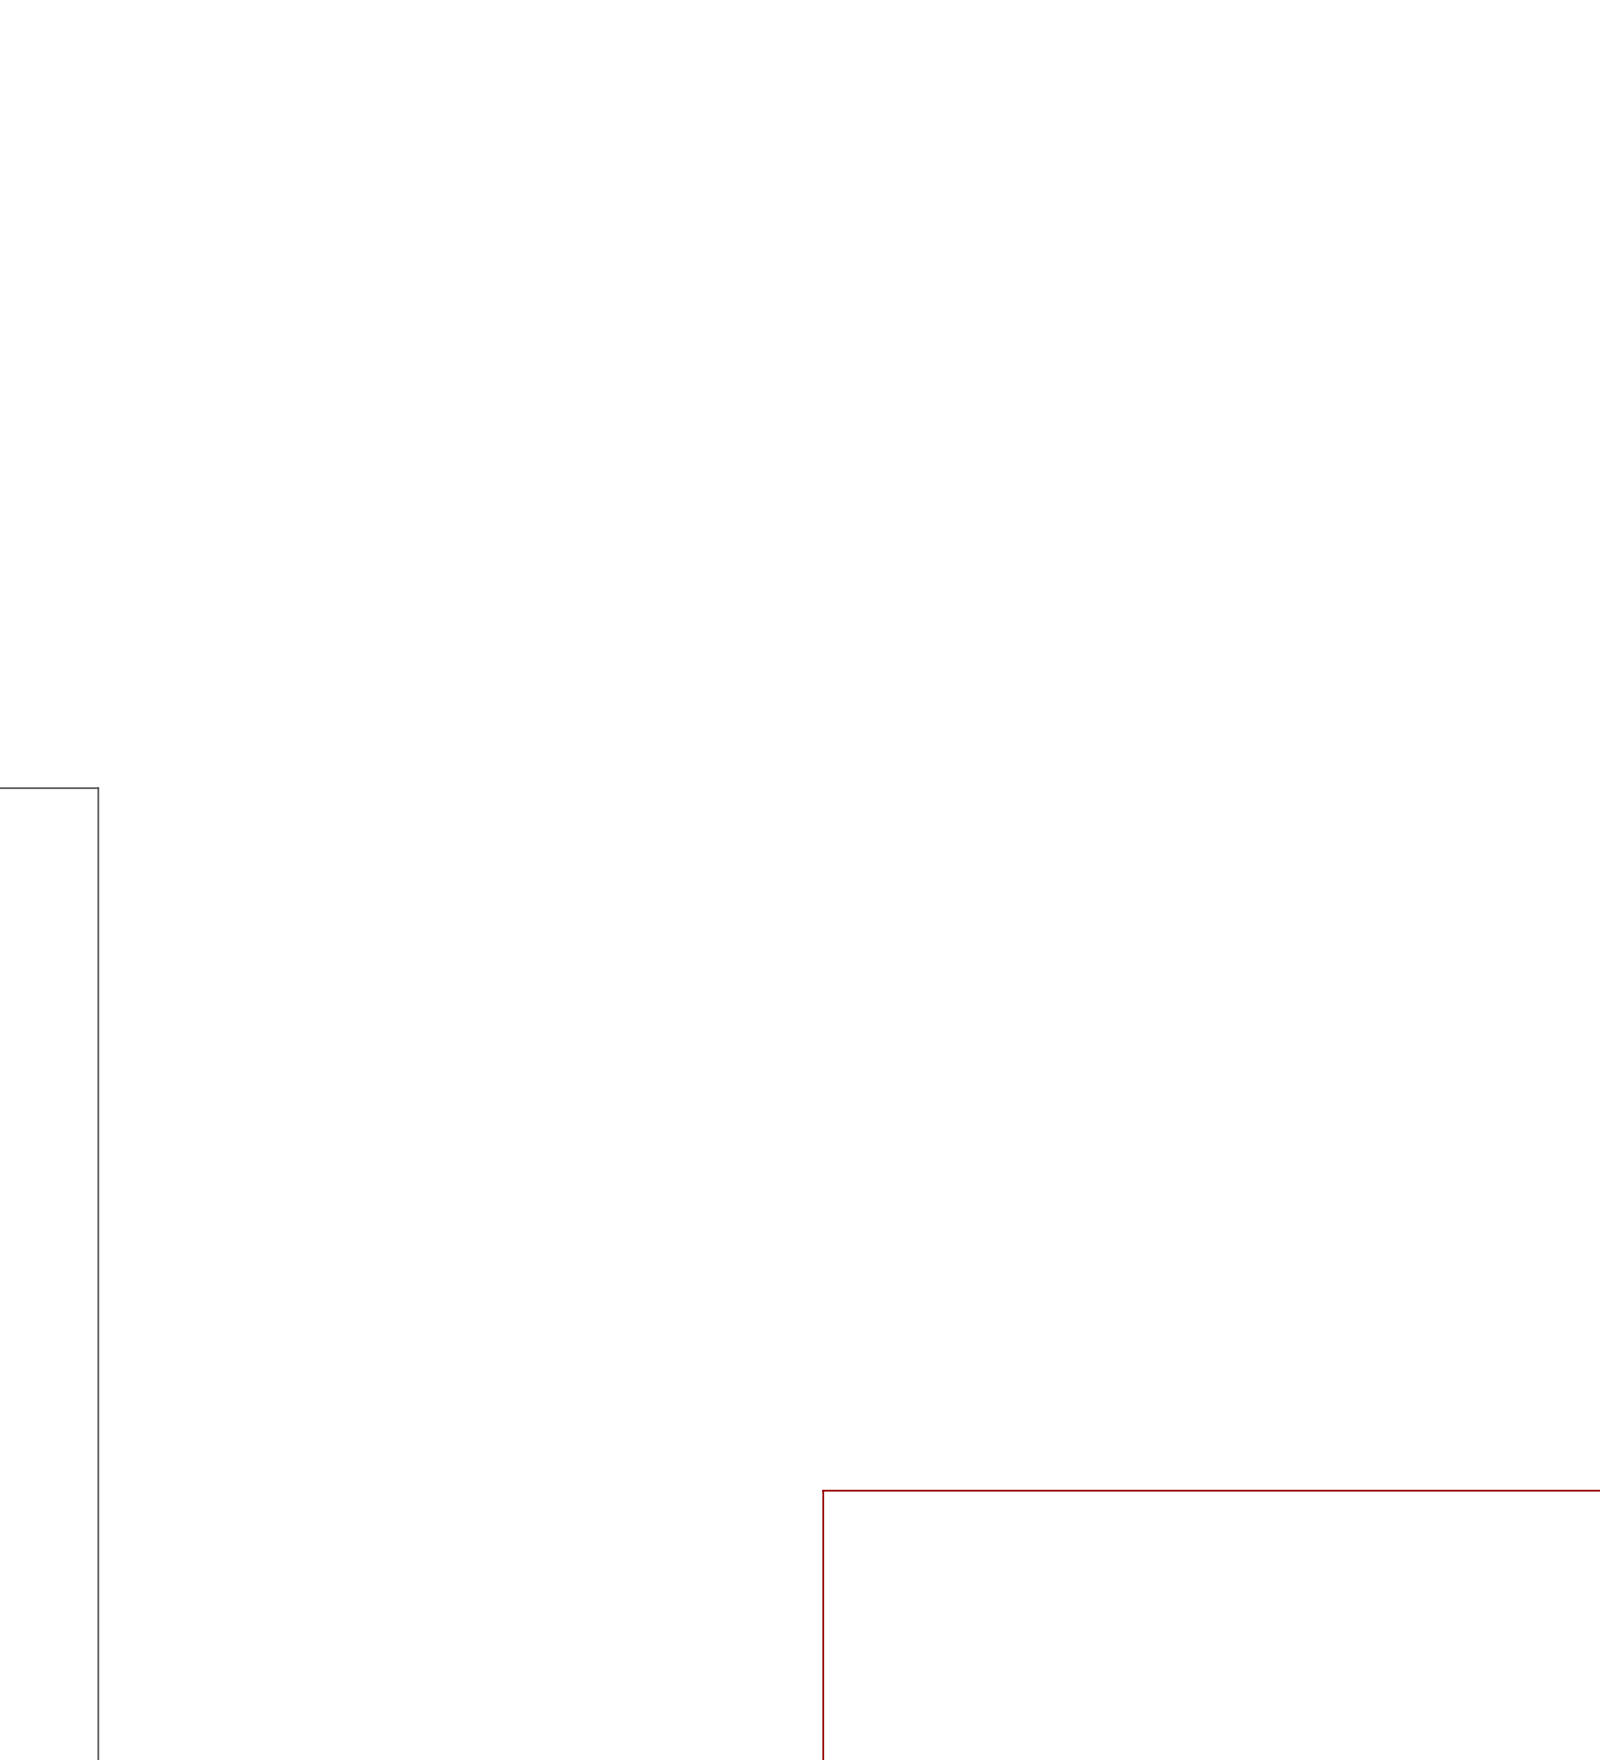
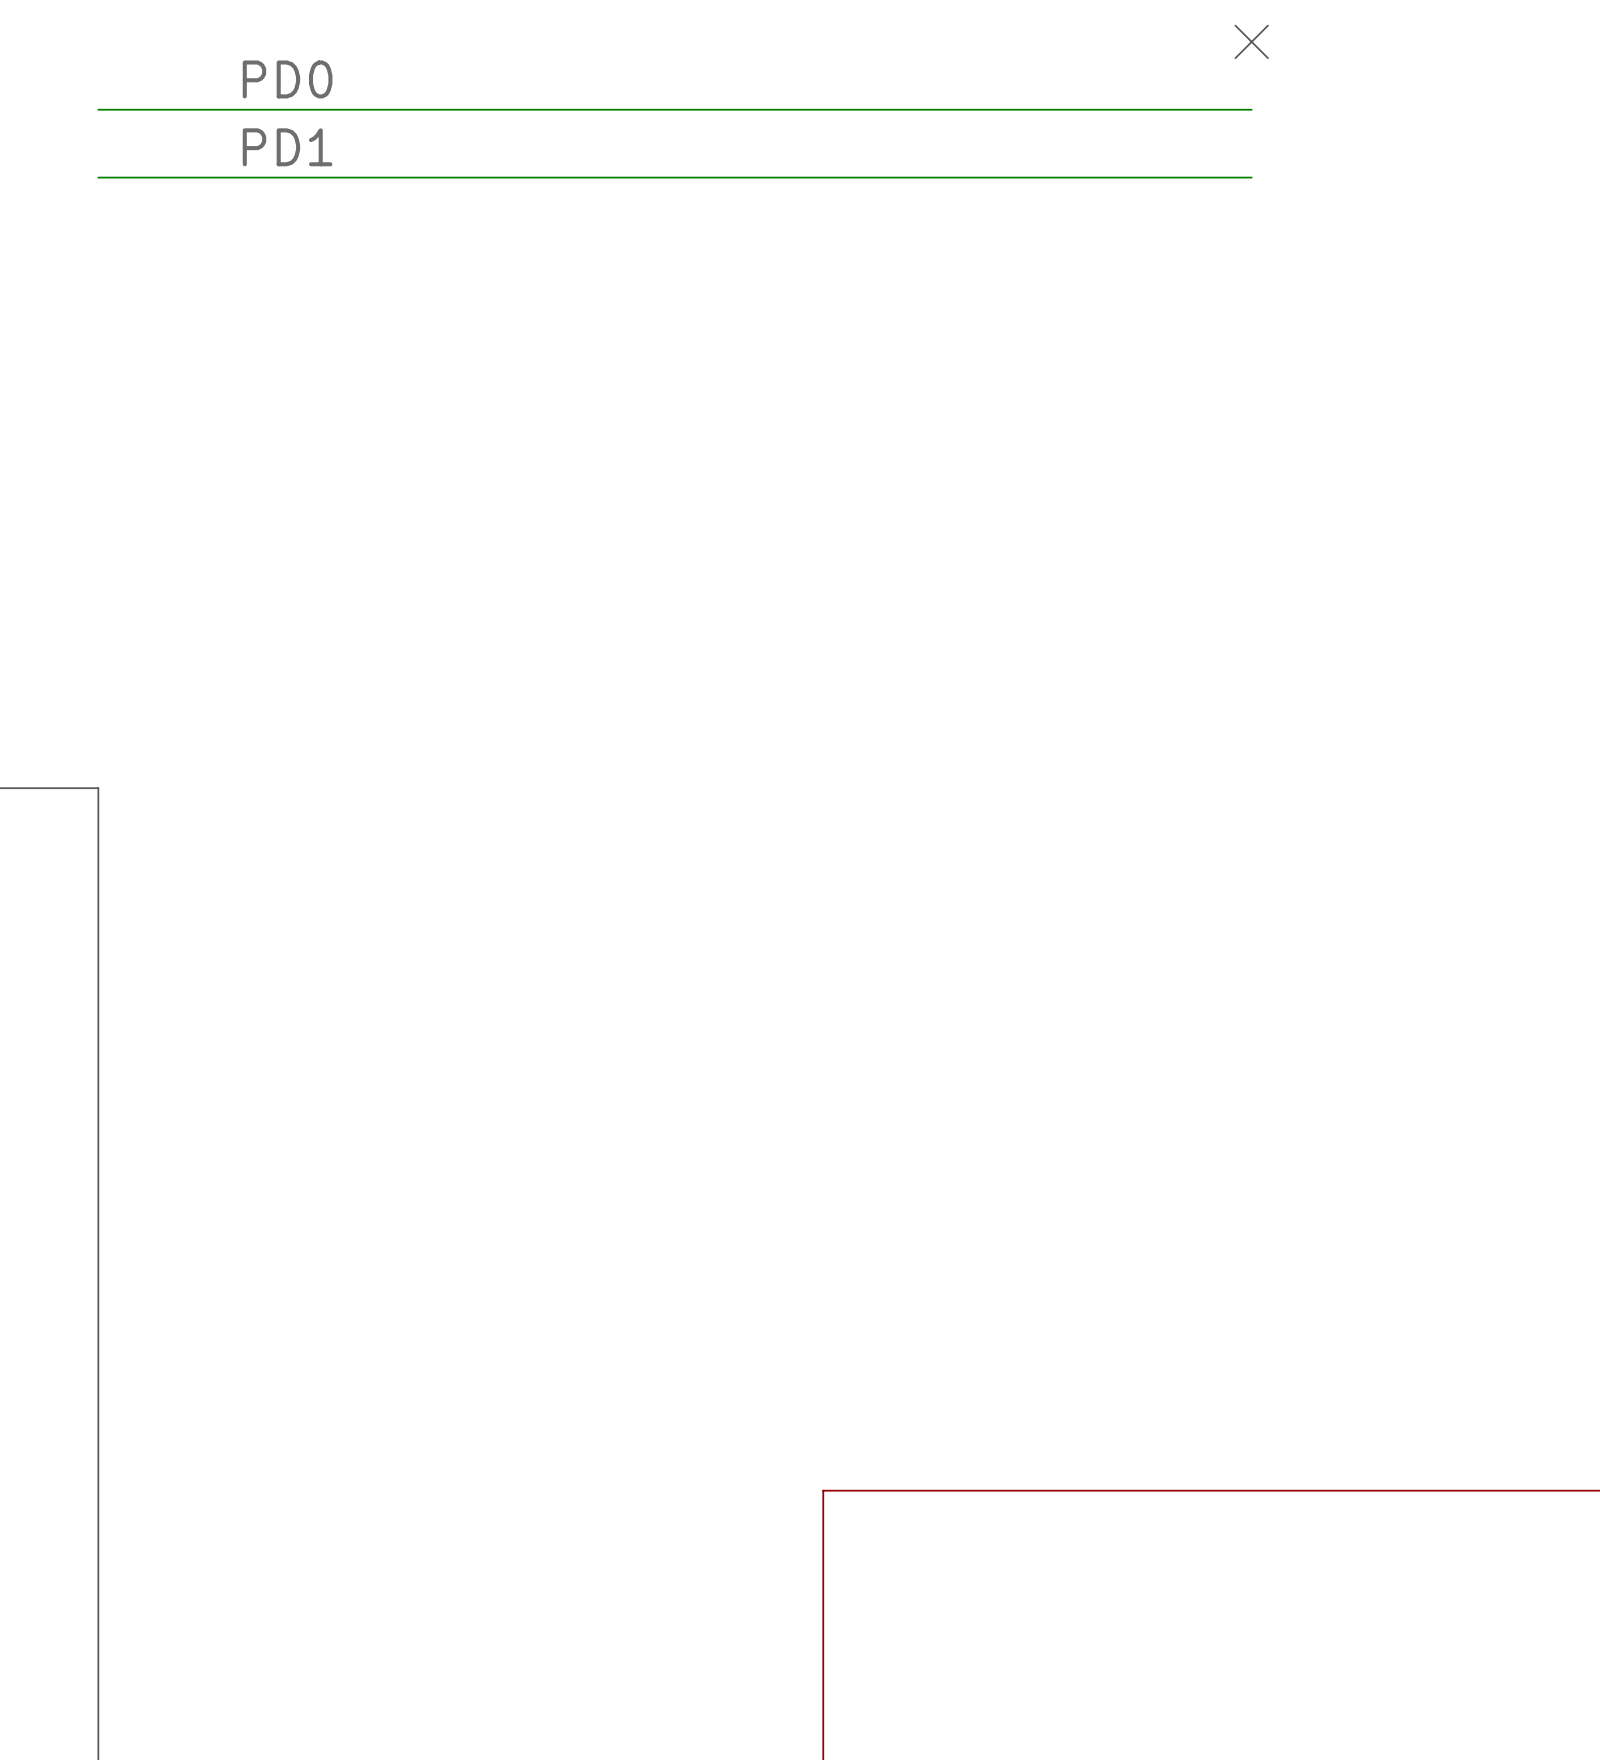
no-connect mark: none -> (1251, 41)
label: none -> PD0 (287, 79)
wire: none -> (98, 109) (1251, 109)
label: none -> PD1 (287, 147)
wire: none -> (98, 177) (1251, 177)

